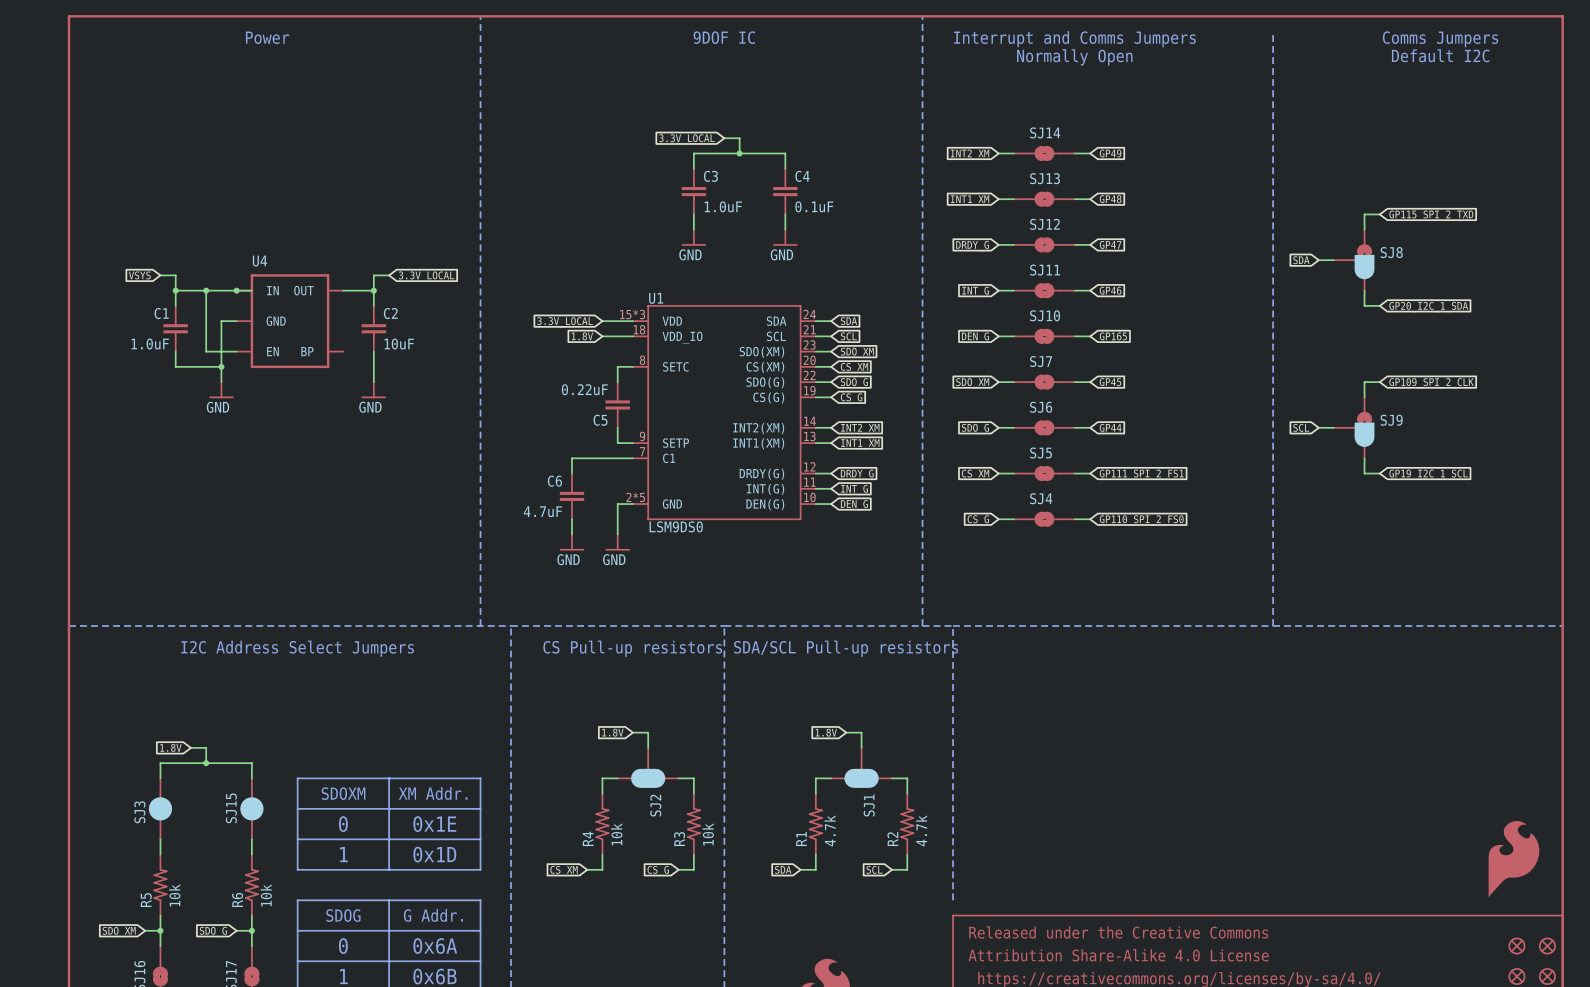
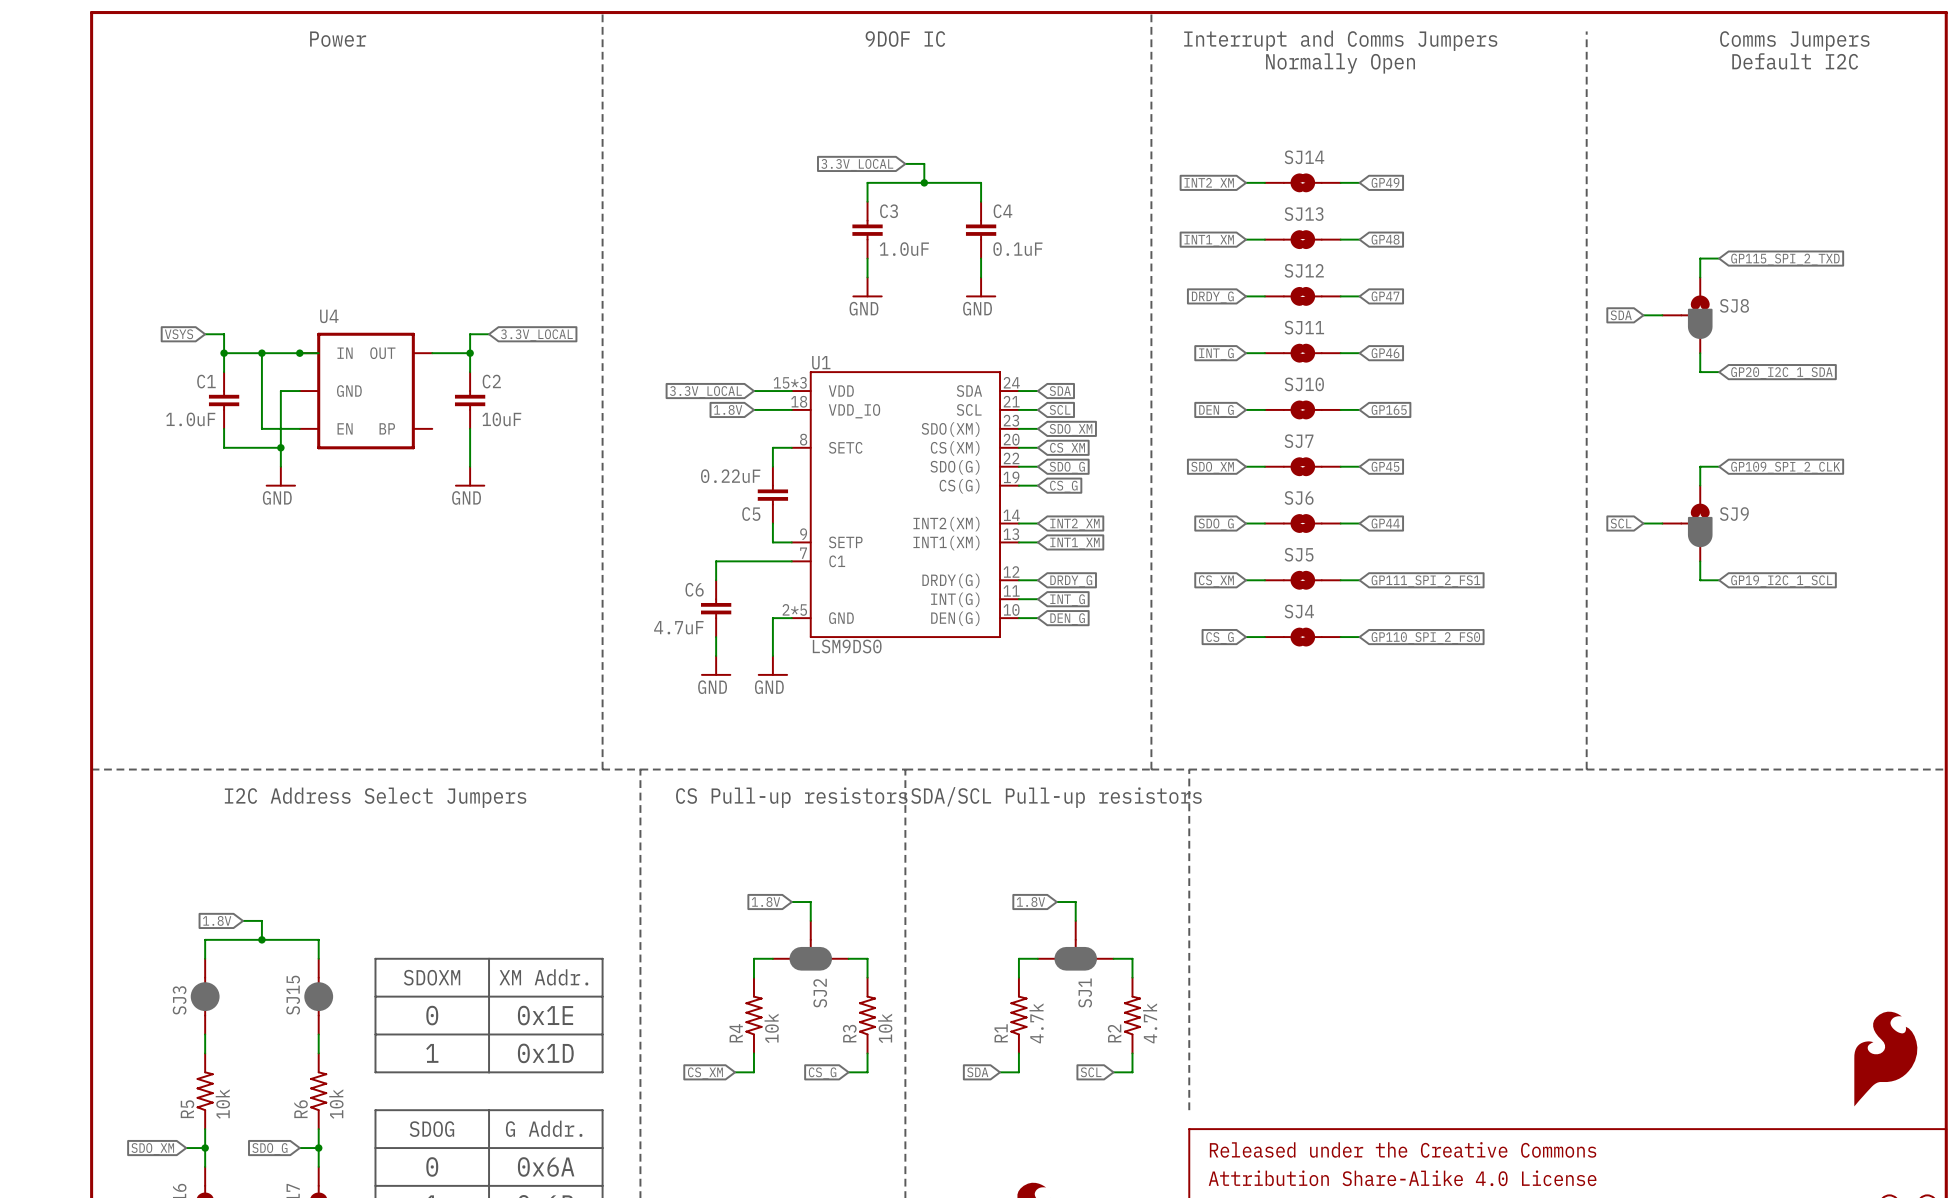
part: (1516, 946) -> none
part: (1547, 946) -> none

